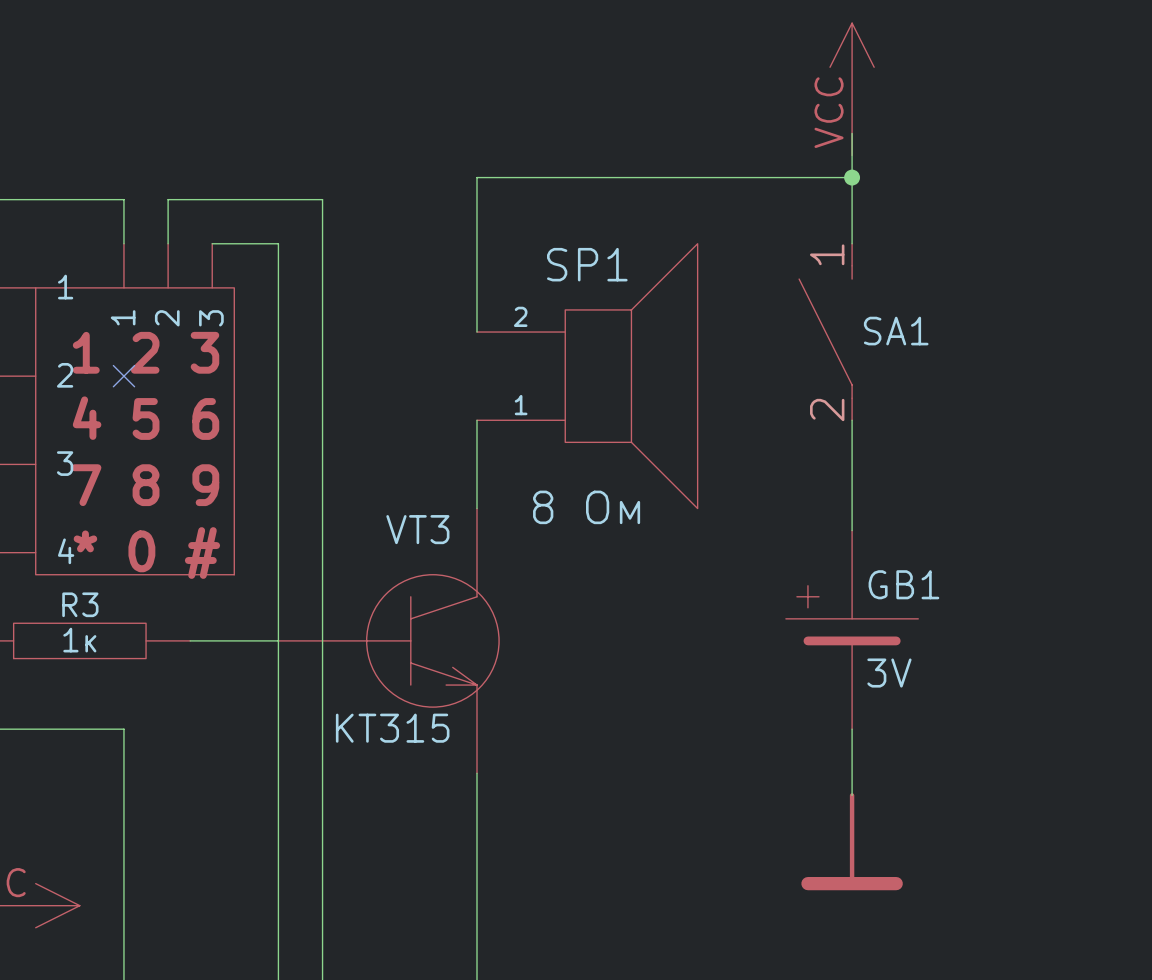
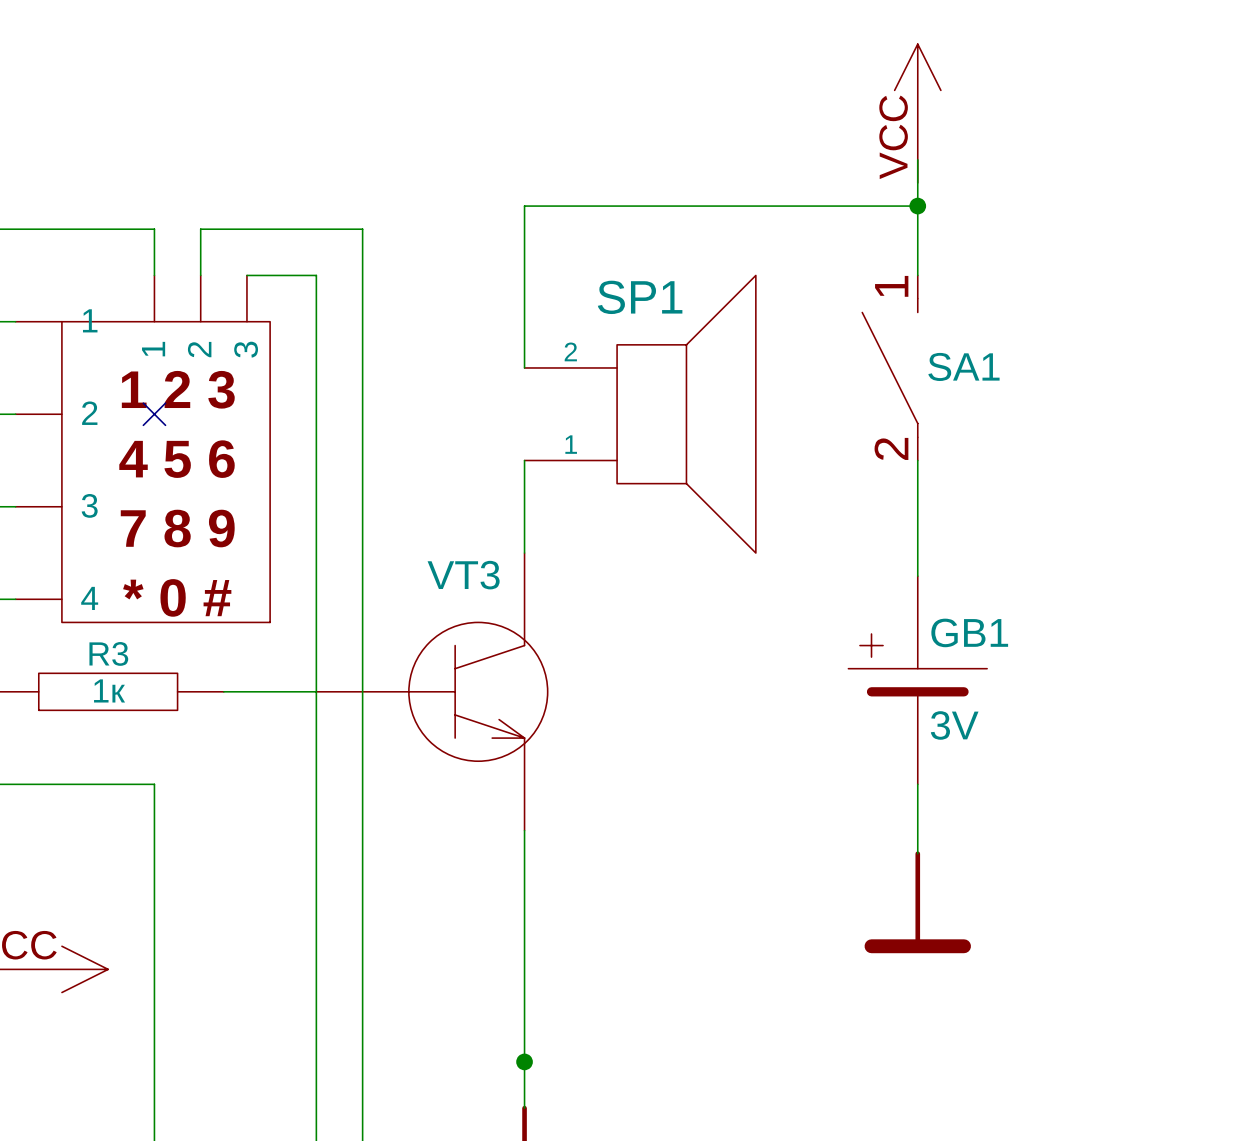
SP1 value: 8 Ом (586, 507) -> none
VT3 value: КТ315 (392, 728) -> none

